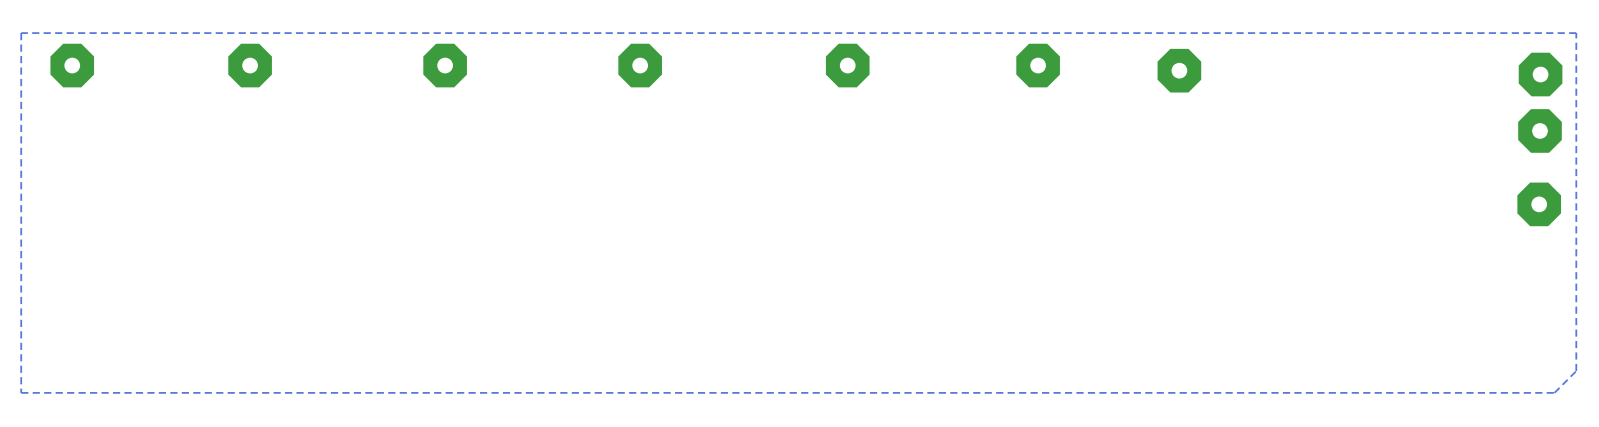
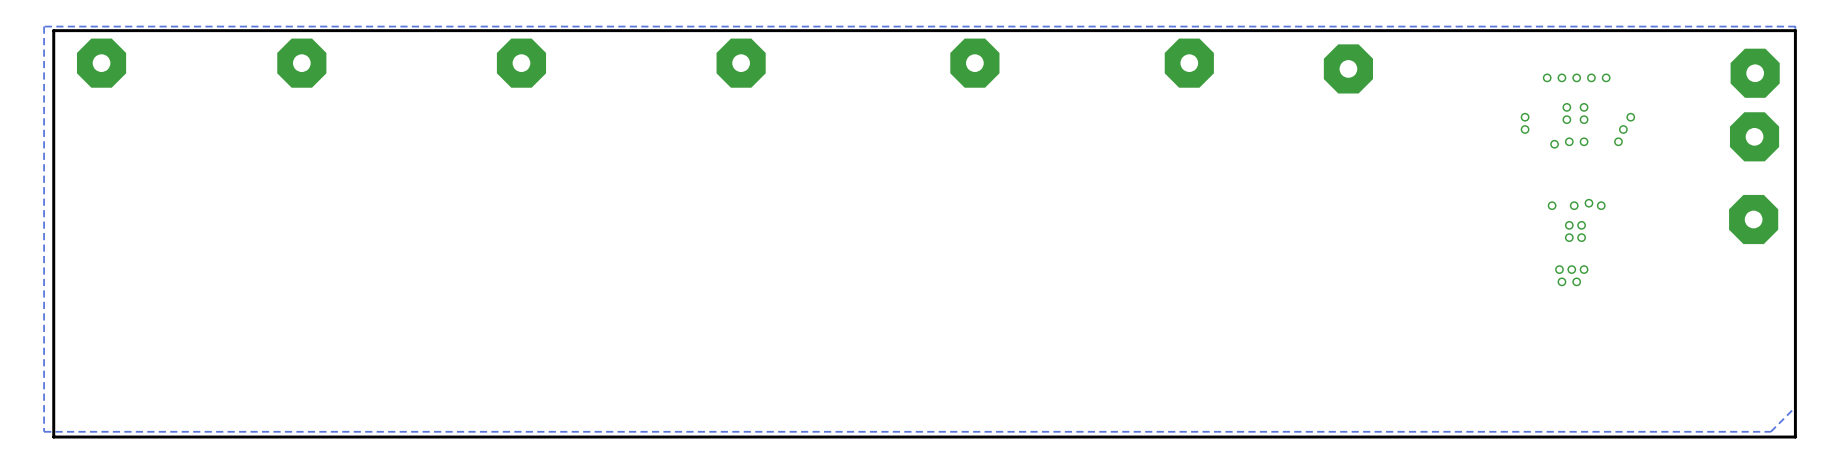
board edge: none -> (1795, 30) (1795, 437) (53, 437) (53, 30) (1795, 30)
via: none -> (1547, 77)
via: none -> (1561, 77)
via: none -> (1576, 77)
via: none -> (1591, 77)
via: none -> (1606, 77)
via: none -> (1566, 107)
via: none -> (1584, 107)
via: none -> (1525, 117)
via: none -> (1630, 117)
via: none -> (1566, 119)
via: none -> (1584, 119)
via: none -> (1525, 129)
via: none -> (1623, 129)
via: none -> (1569, 141)
via: none -> (1584, 141)
via: none -> (1618, 141)
via: none -> (1554, 144)
via: none -> (1588, 203)
via: none -> (1552, 205)
via: none -> (1574, 205)
via: none -> (1601, 205)
via: none -> (1569, 225)
via: none -> (1581, 225)
via: none -> (1569, 237)
via: none -> (1581, 237)
via: none -> (1559, 269)
via: none -> (1571, 269)
via: none -> (1584, 269)
via: none -> (1561, 281)
via: none -> (1576, 281)

